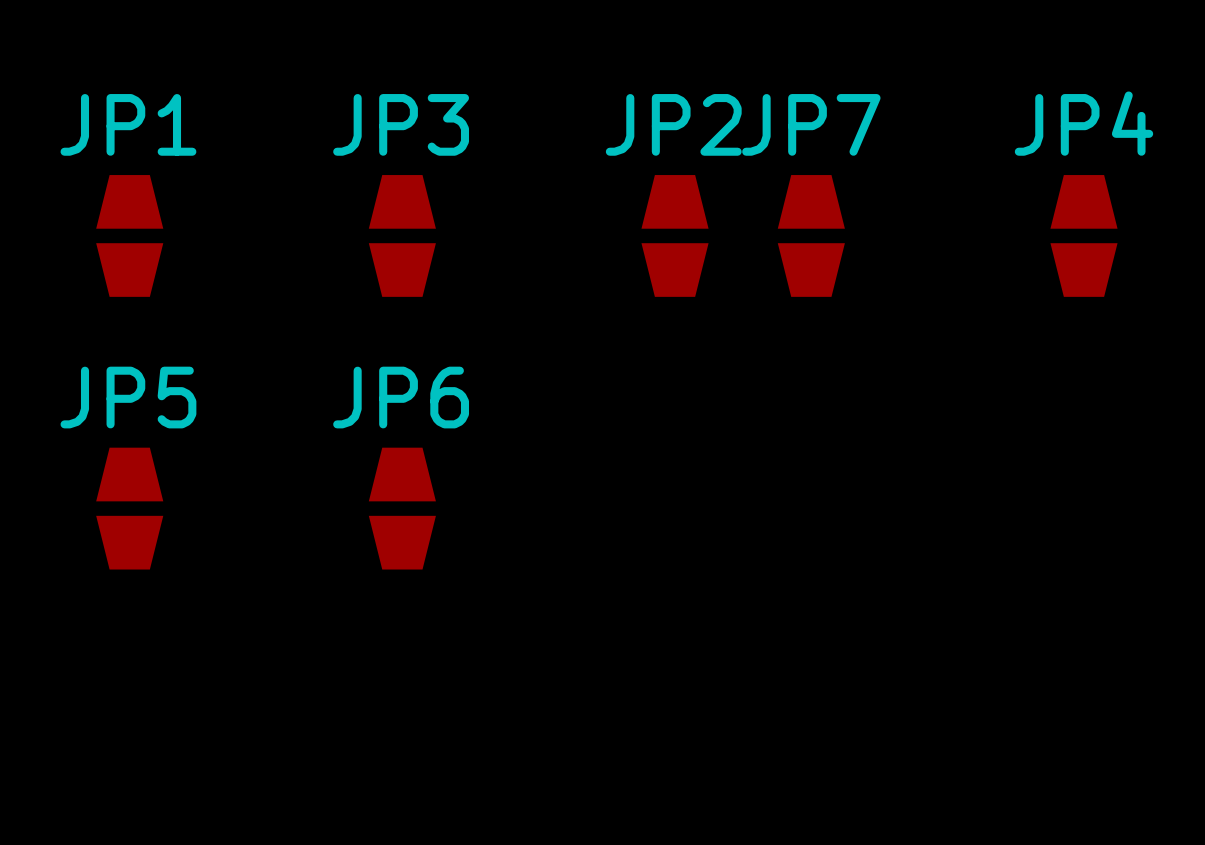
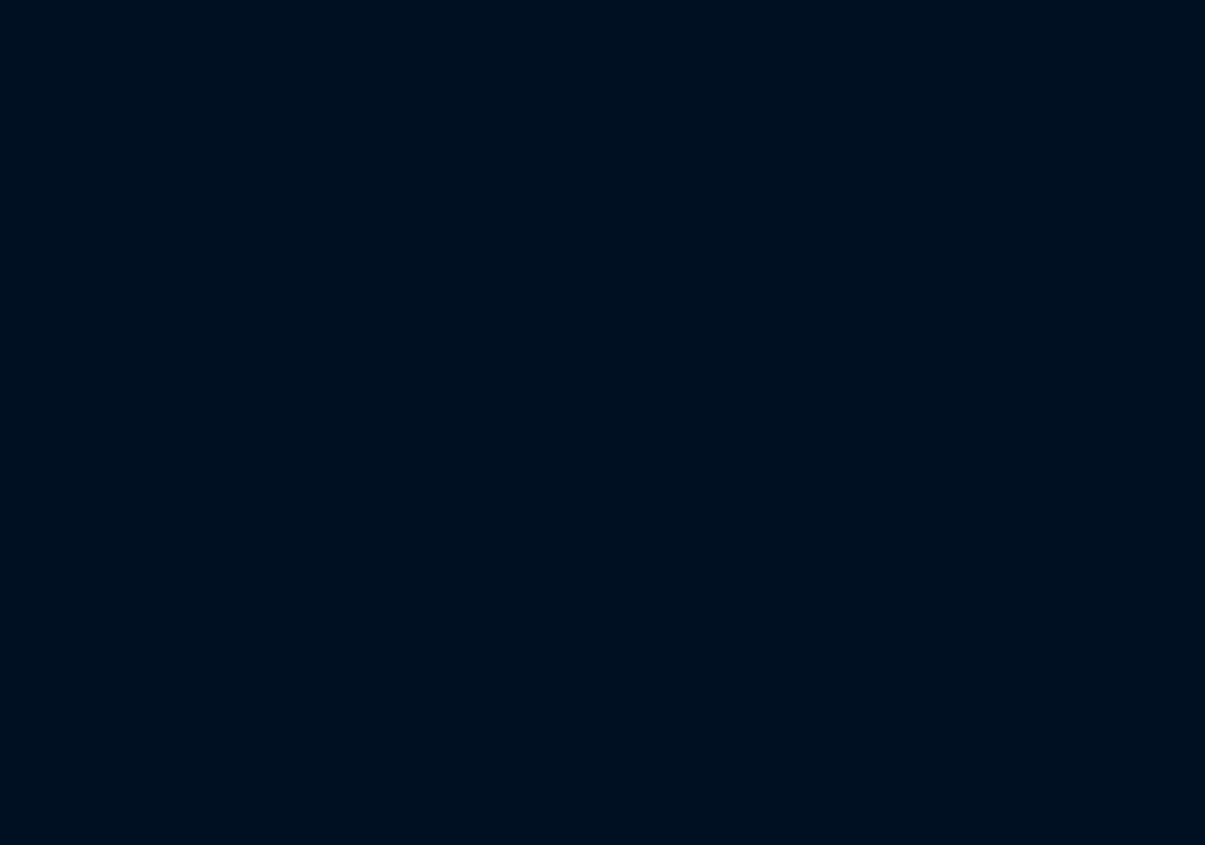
JP1: (129, 235) -> none
JP3: (402, 235) -> none
JP2: (675, 235) -> none
JP7: (811, 235) -> none
JP4: (1083, 235) -> none
JP5: (129, 508) -> none
JP6: (402, 508) -> none

